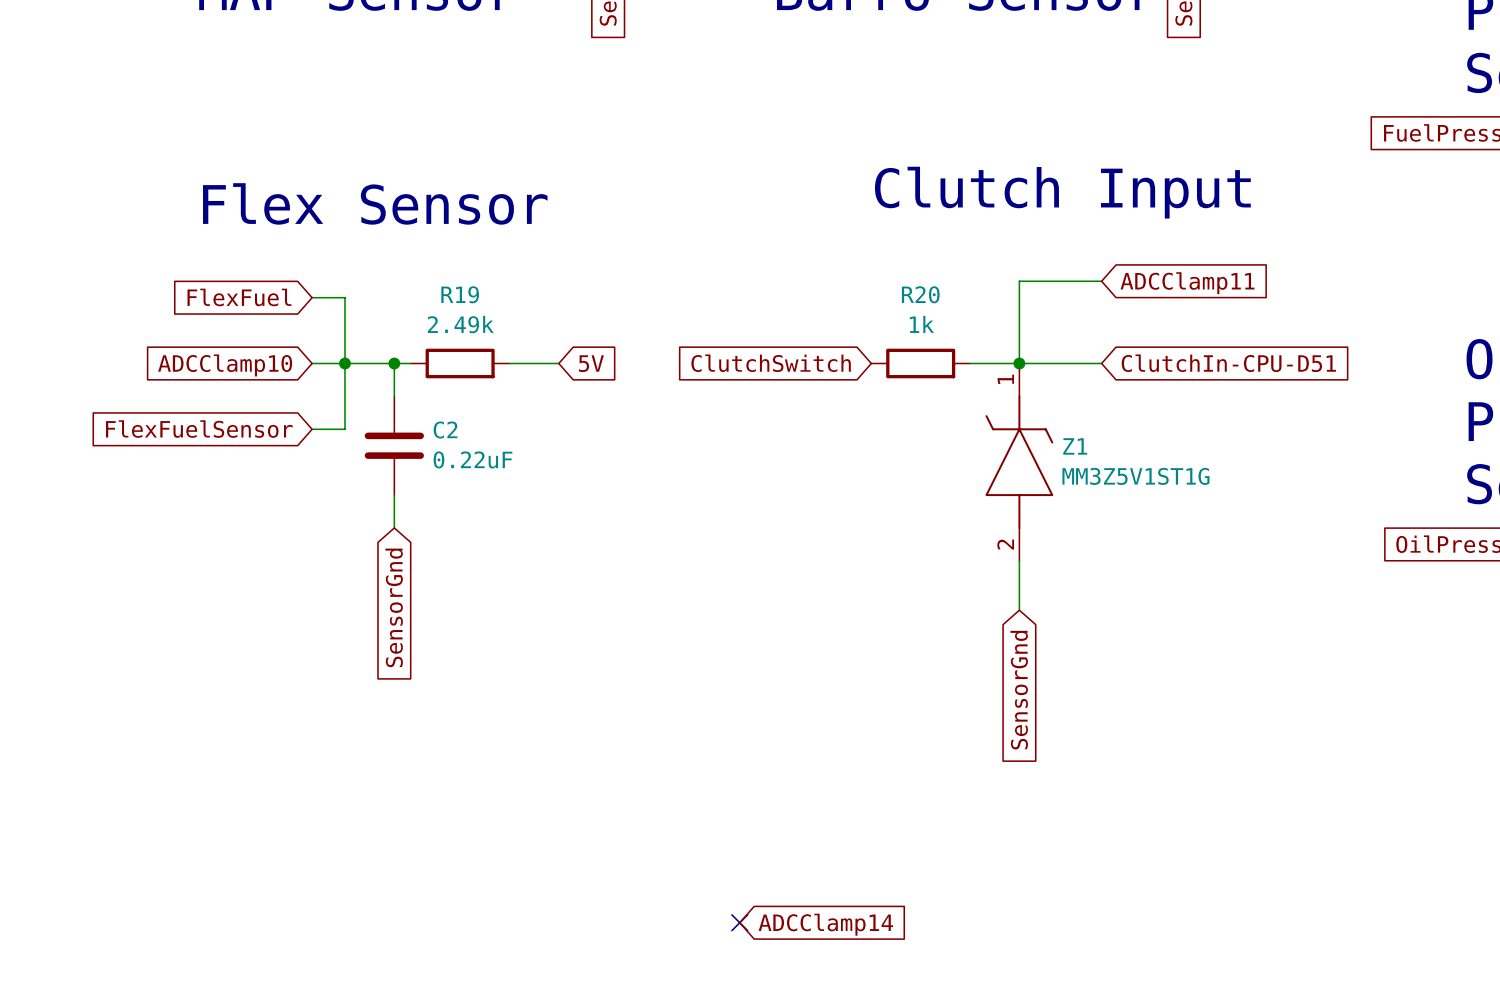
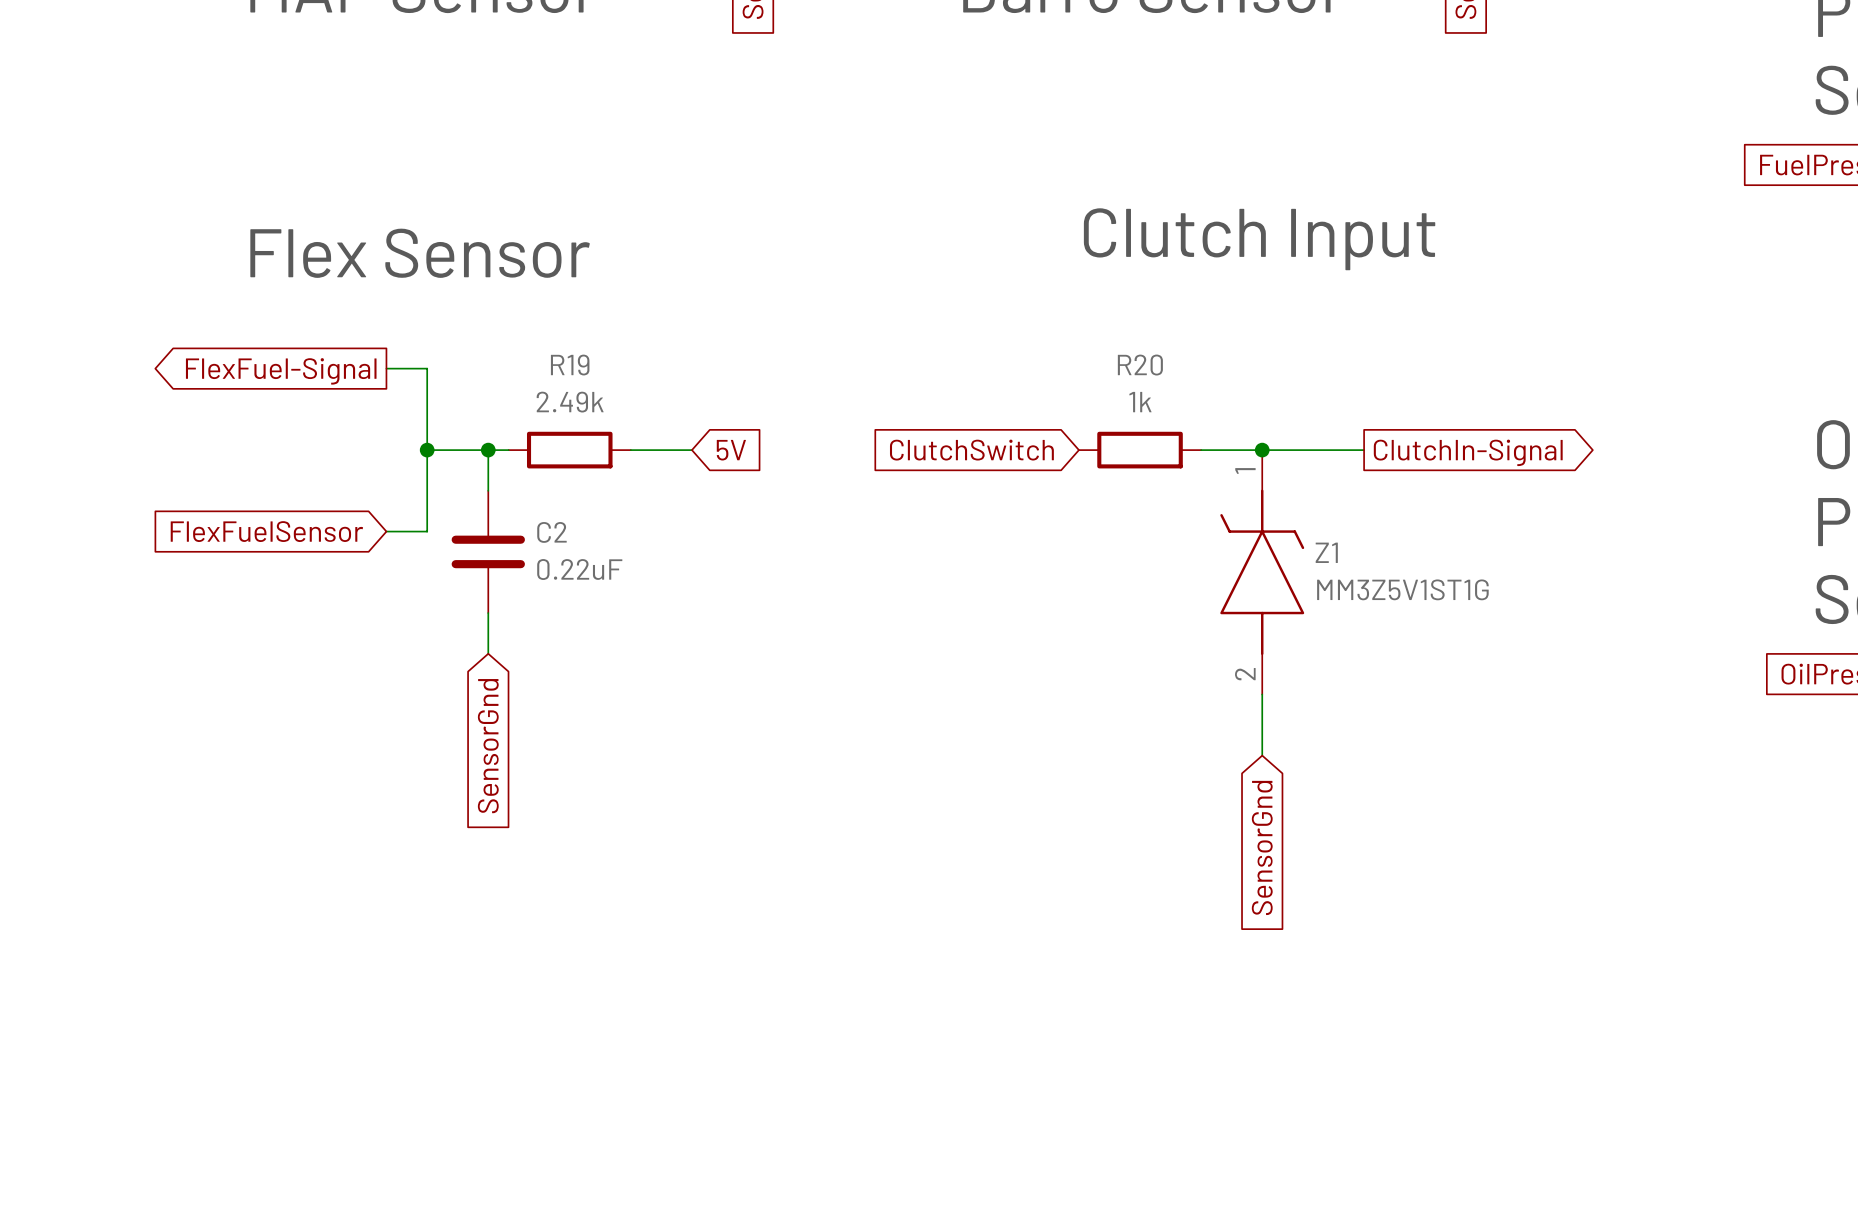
wire: (1101, 281) (1019, 281) (1019, 363) -> none
global label: ADCClamp11 (1187, 283) -> none
global label shape: input (239, 297) -> output (281, 371)
global label: FlexFuel (239, 297) -> FlexFuel-Signal (281, 371)
wire: (312, 363) (344, 363) -> none
global label shape: input (1228, 363) -> output (1468, 452)
global label: ClutchIn-CPU-D51 (1228, 363) -> ClutchIn-Signal (1468, 452)
global label: ADCClamp10 (225, 365) -> none
no-connect mark: (739, 922) -> none
global label: ADCClamp14 (825, 924) -> none

